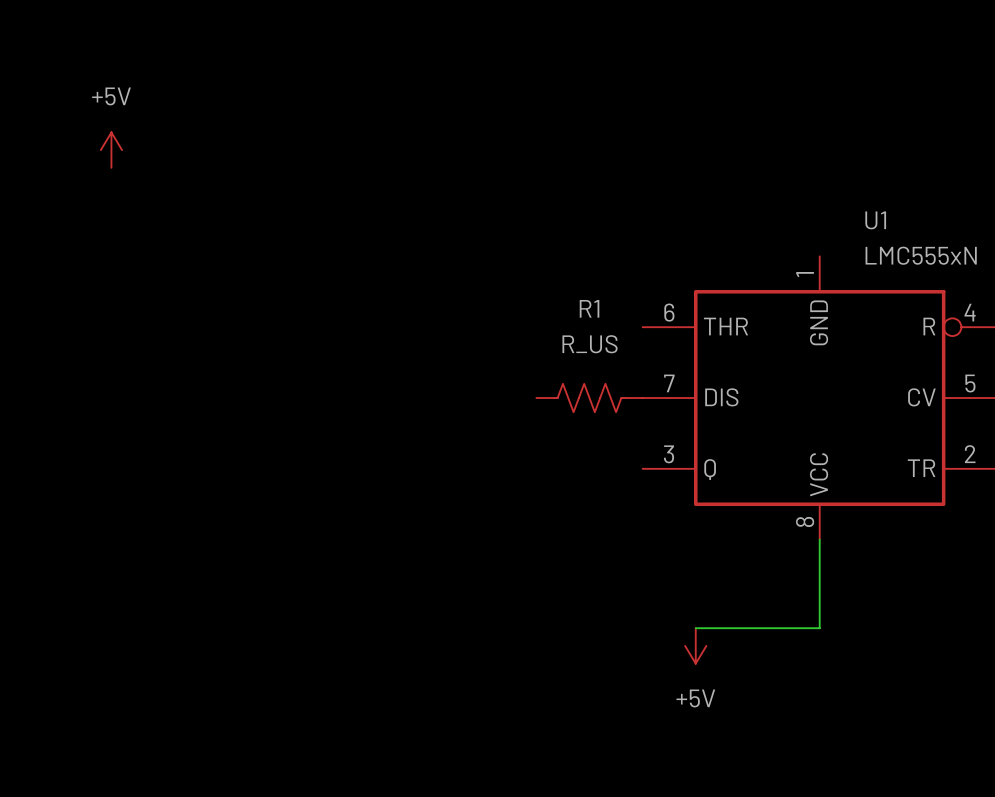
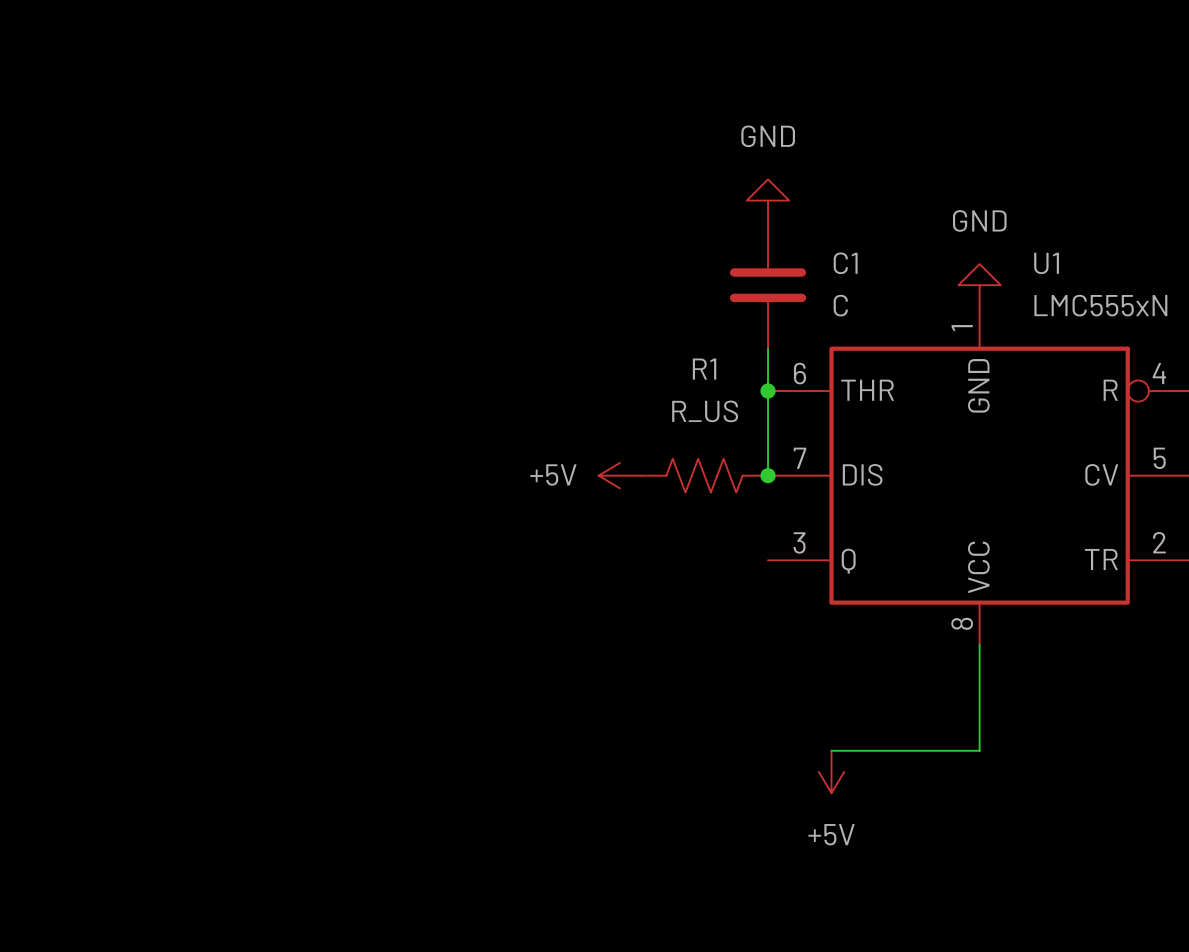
power symbol: +5V (111, 150) -> none
power symbol: none -> GND (768, 200)
C1: none -> C (768, 285)
power symbol: none -> GND (979, 285)
wire: none -> (768, 348) (768, 475)
junction: none -> (768, 391)
power symbol: none -> +5V (619, 475)
junction: none -> (768, 475)

